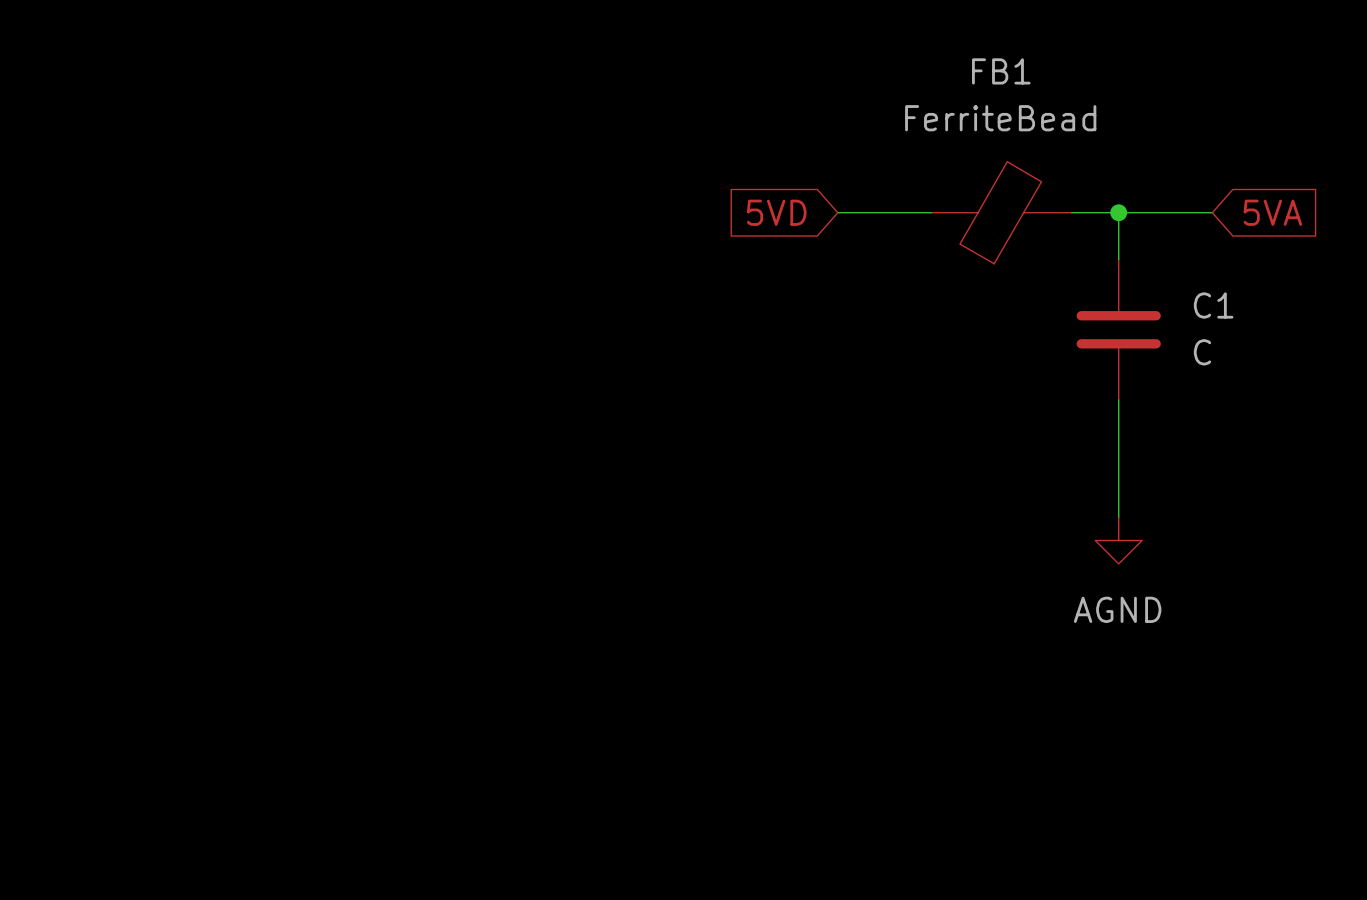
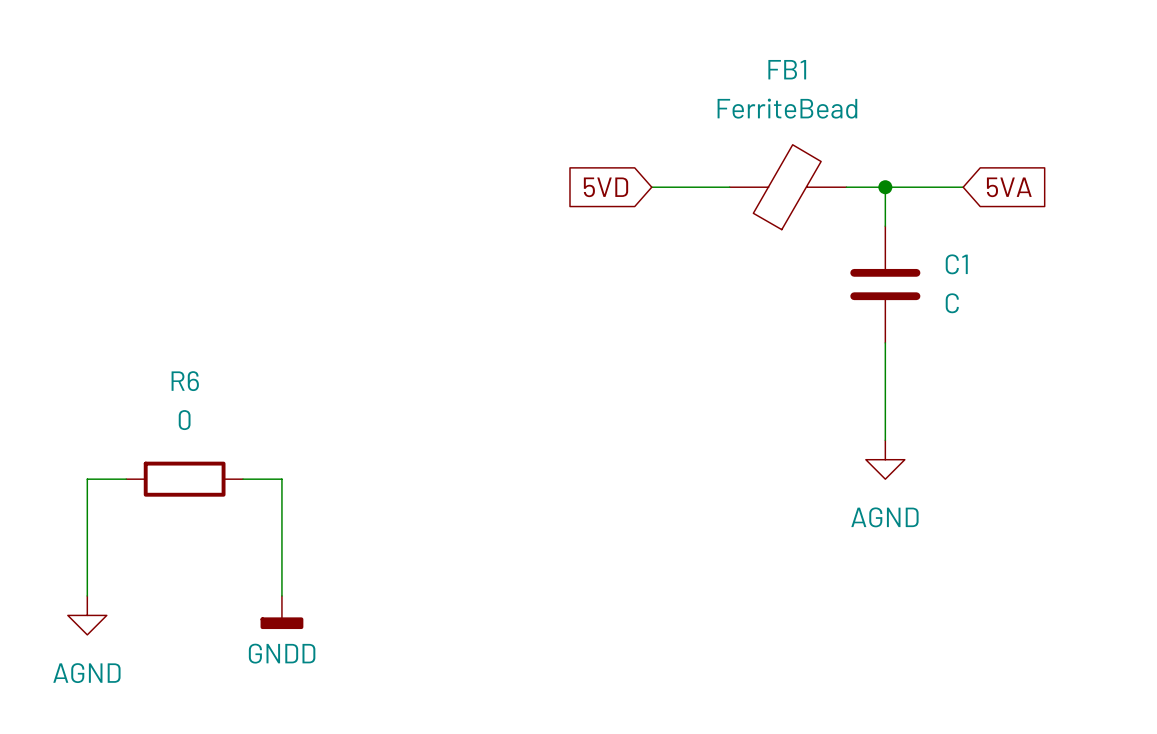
wire: none -> (126, 479) (87, 479) (87, 595)
R6: none -> 0 (184, 479)
wire: none -> (243, 479) (281, 479) (281, 595)
power symbol: none -> GNDD (281, 612)
power symbol: none -> AGND (87, 615)

